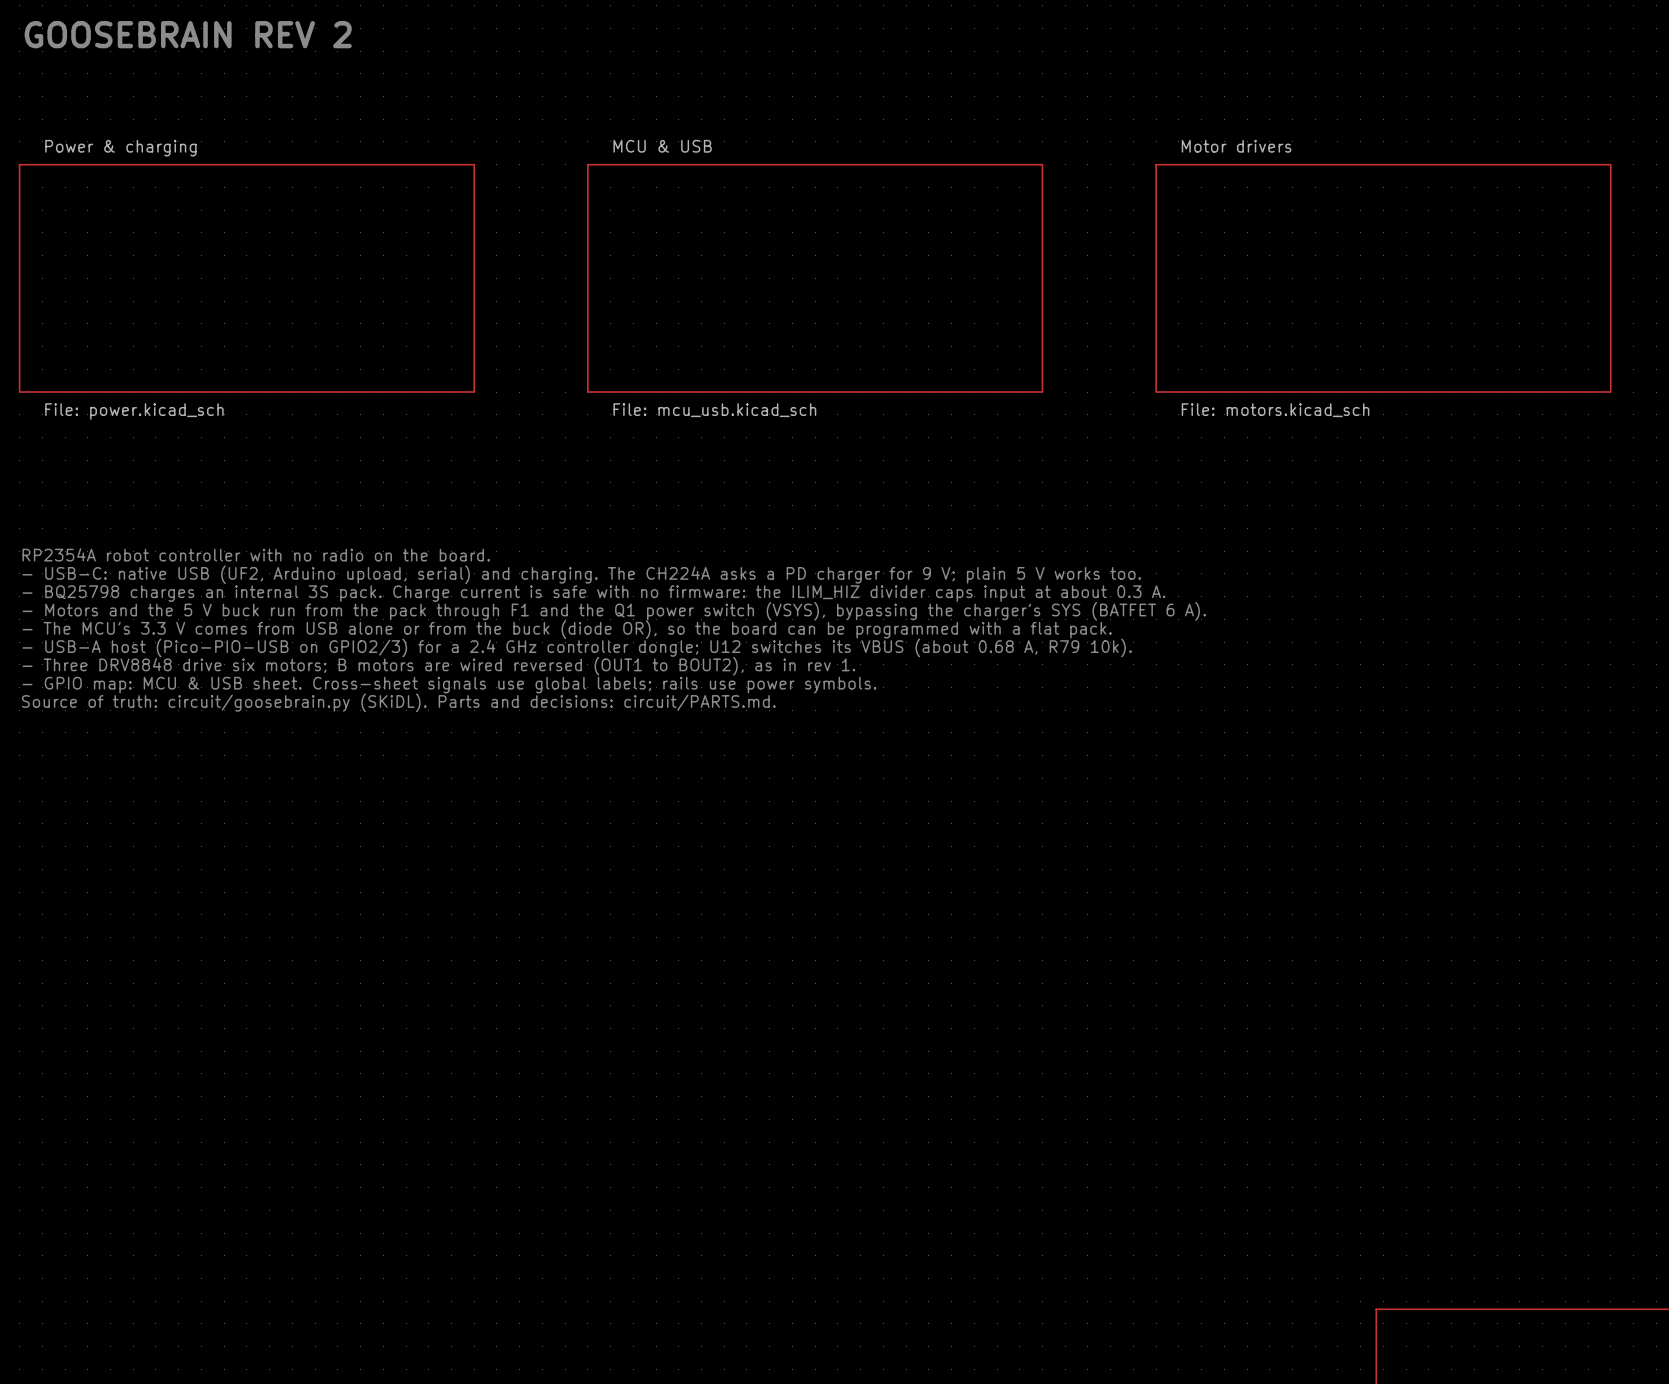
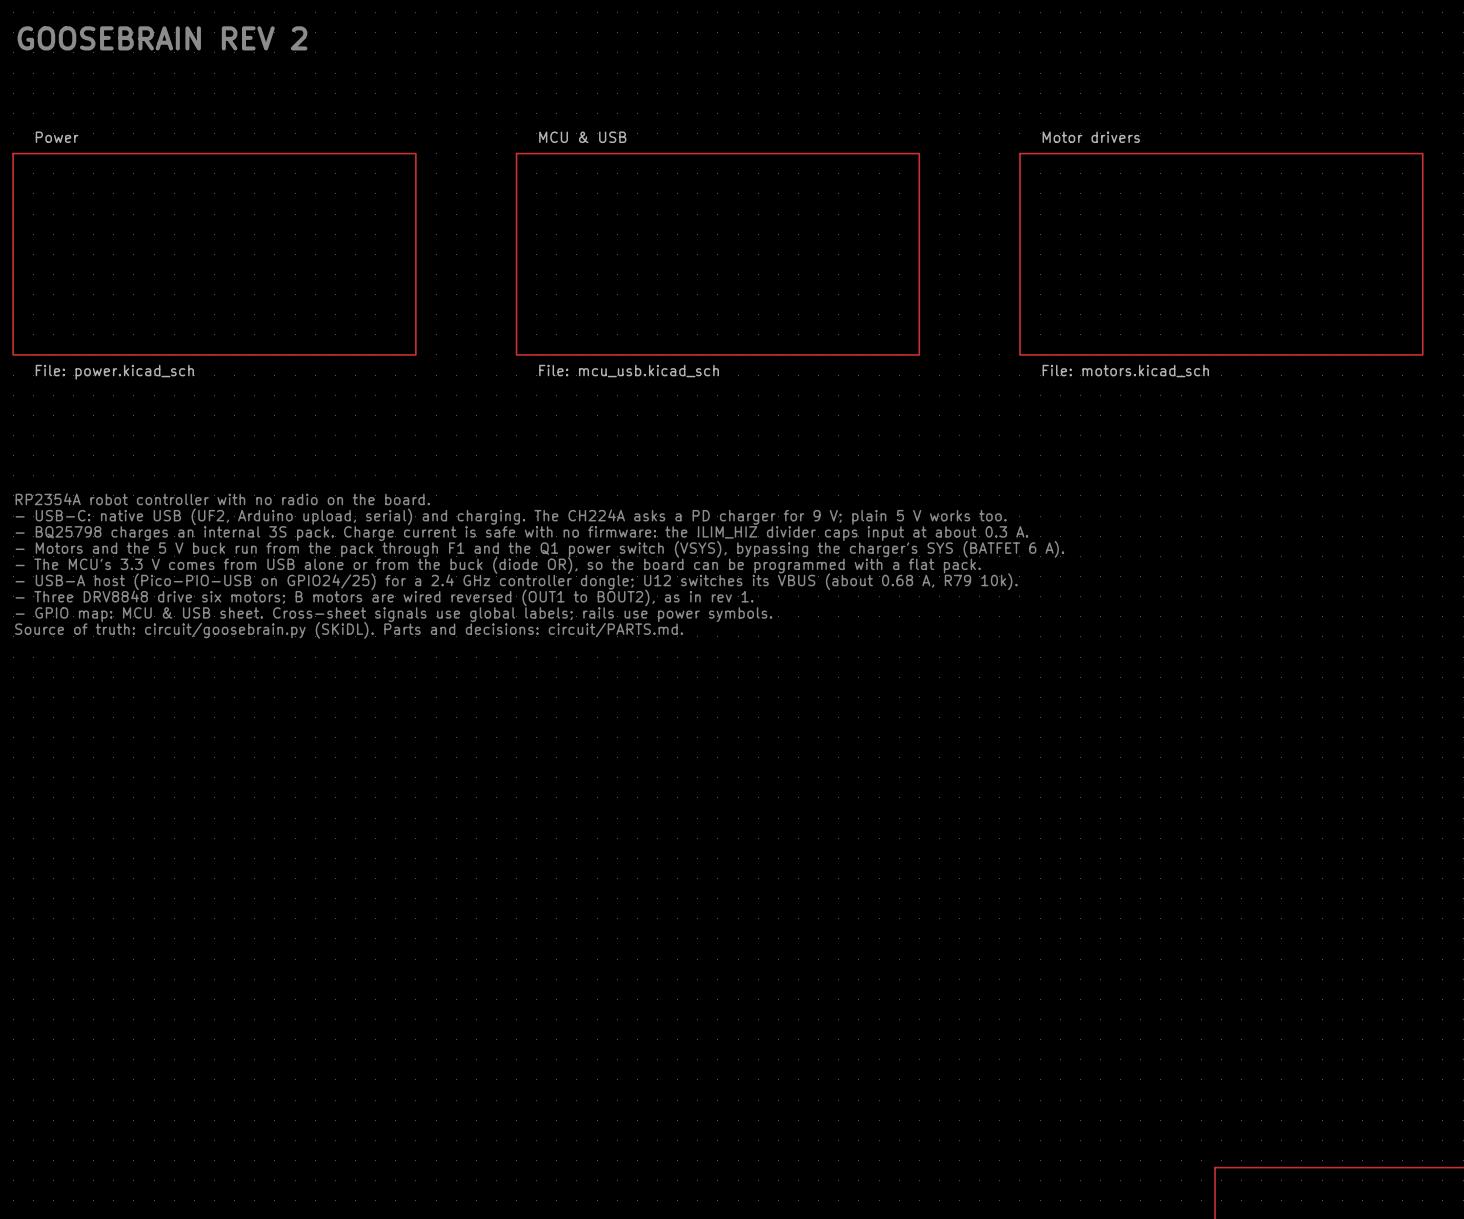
sheet Power & charging name: Power & charging (120, 148) -> Power (57, 137)
text: - USB-A host (Pico-PIO-USB on GPIO2/3) for a 2.4 GHz controller dongle; U12 switches its VBUS (about 0.68 A, R79 10k). (577, 647) -> - USB-A host (Pico-PIO-USB on GPIO24/25) for a 2.4 GHz controller dongle; U12 switches its VBUS (about 0.68 A, R79 10k). (516, 581)

